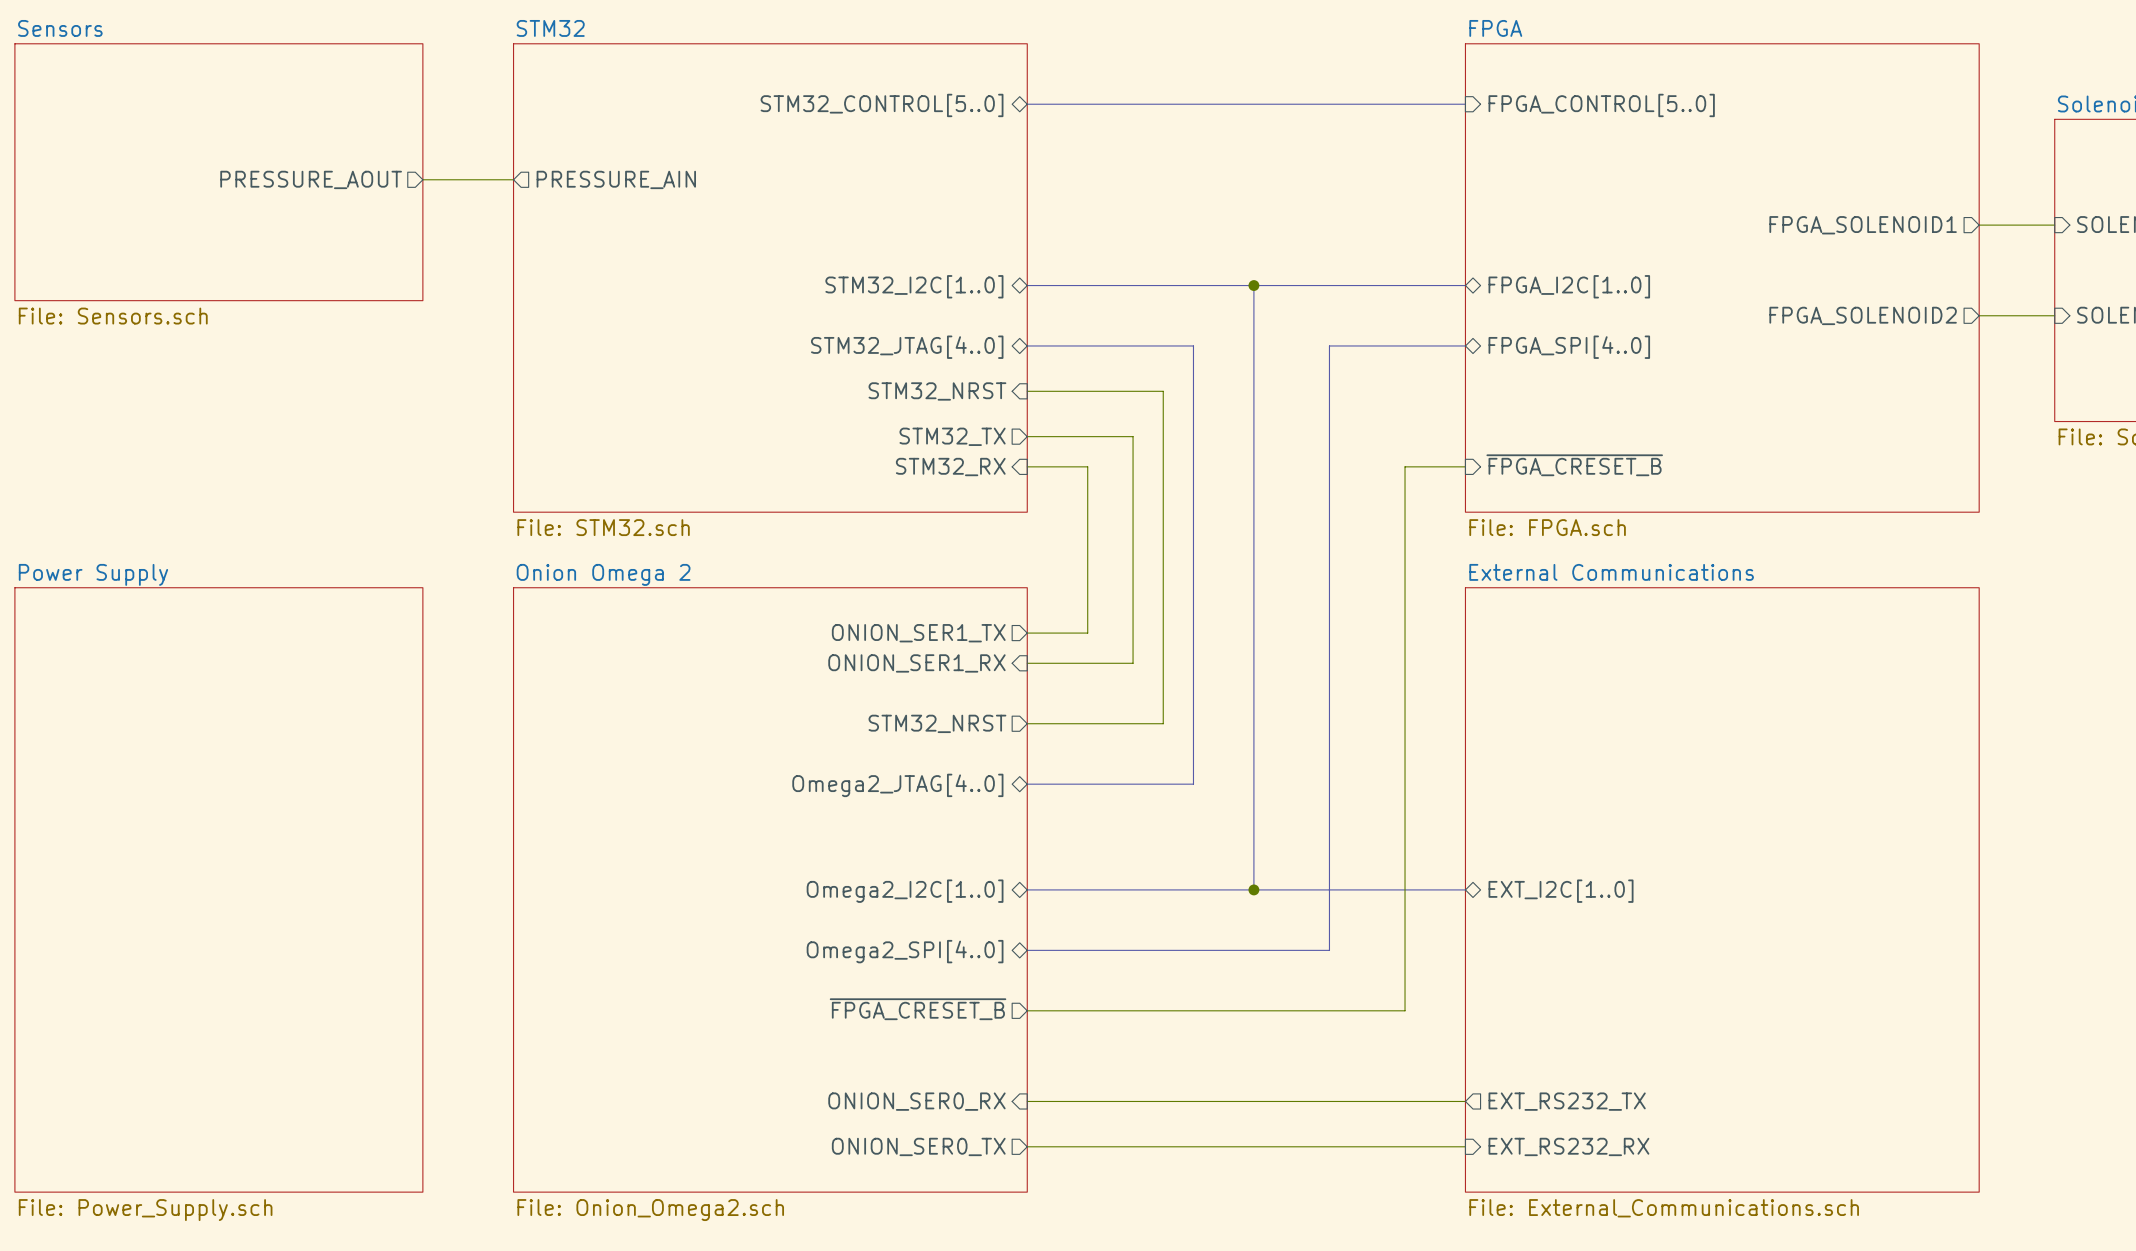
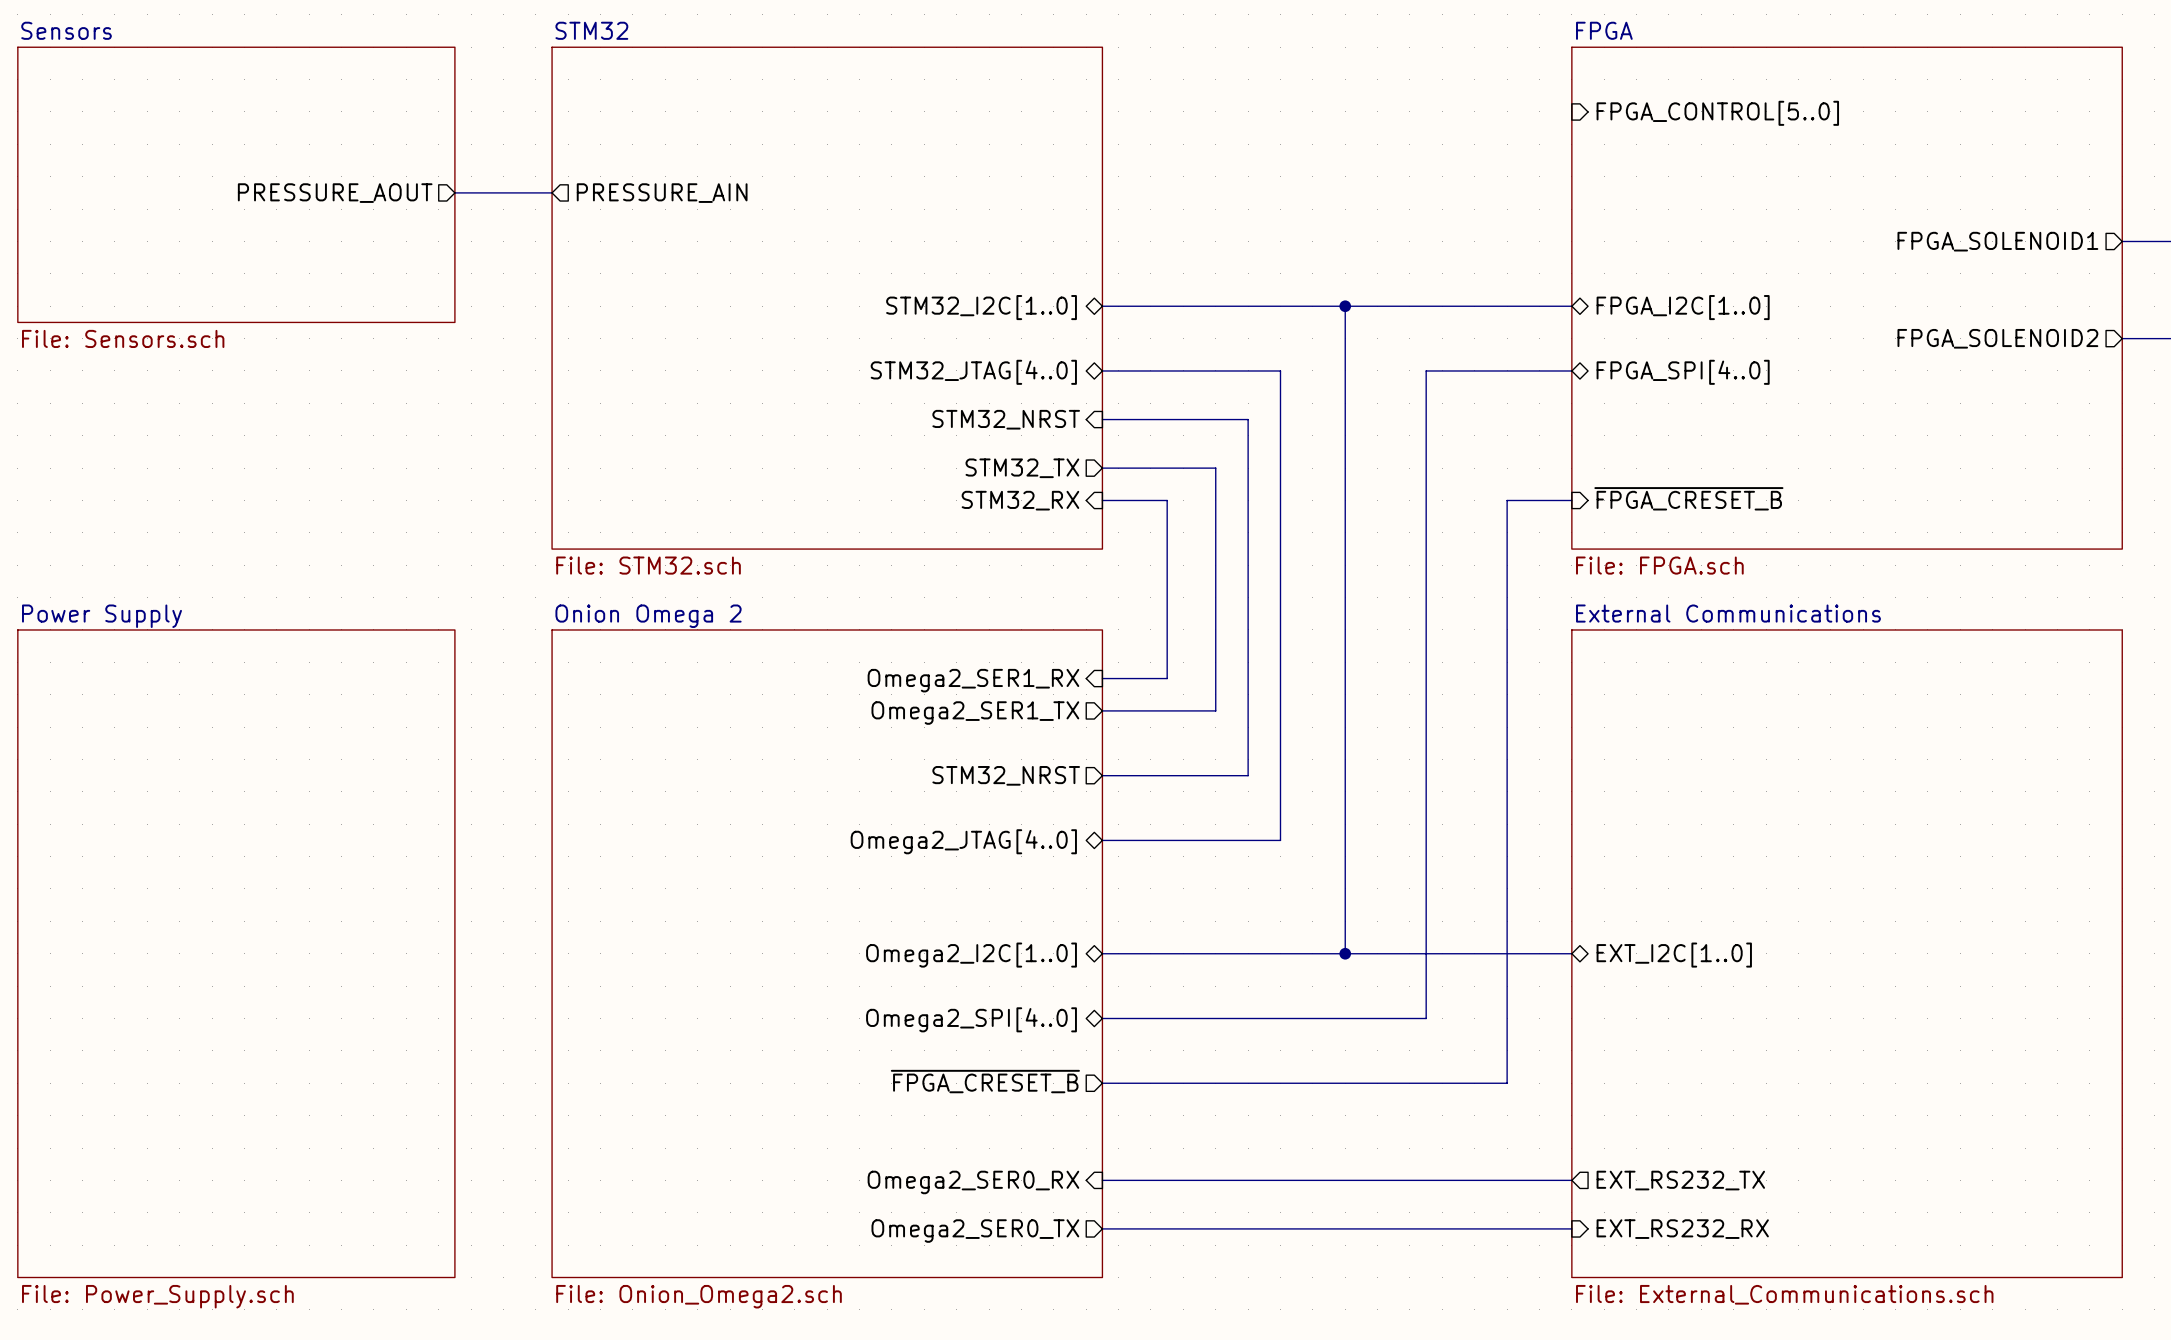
bus: (1027, 104) (1465, 104) -> none
sheet pin: STM32_CONTROL[5..0] (882, 105) -> none
sheet pin shape: output (918, 633) -> input (973, 680)
sheet pin: ONION_SER1_TX (918, 633) -> Omega2_SER1_RX (973, 680)
sheet pin shape: input (916, 663) -> output (975, 713)
sheet pin: ONION_SER1_RX (916, 663) -> Omega2_SER1_TX (975, 713)
sheet pin: ONION_SER0_RX (916, 1101) -> Omega2_SER0_RX (973, 1182)
sheet pin: ONION_SER0_TX (918, 1146) -> Omega2_SER0_TX (975, 1231)

